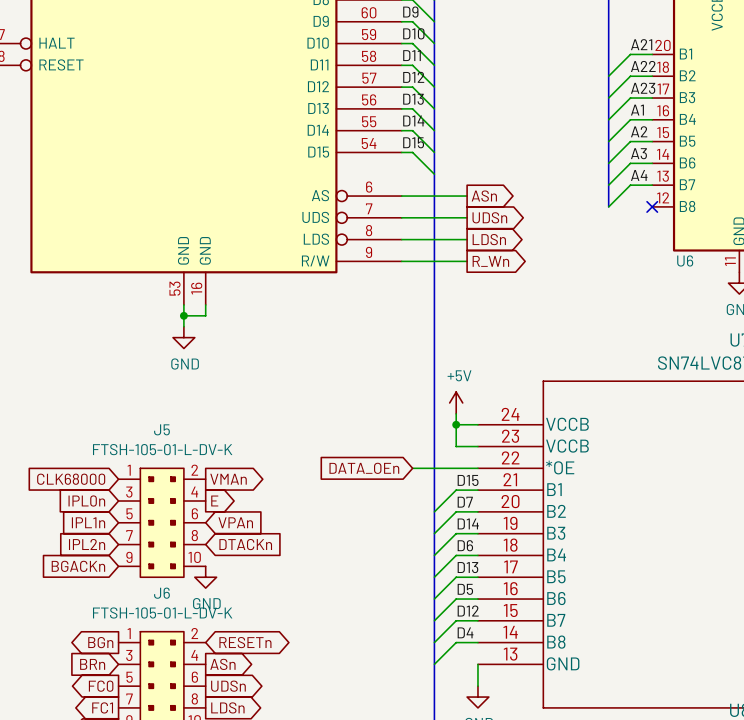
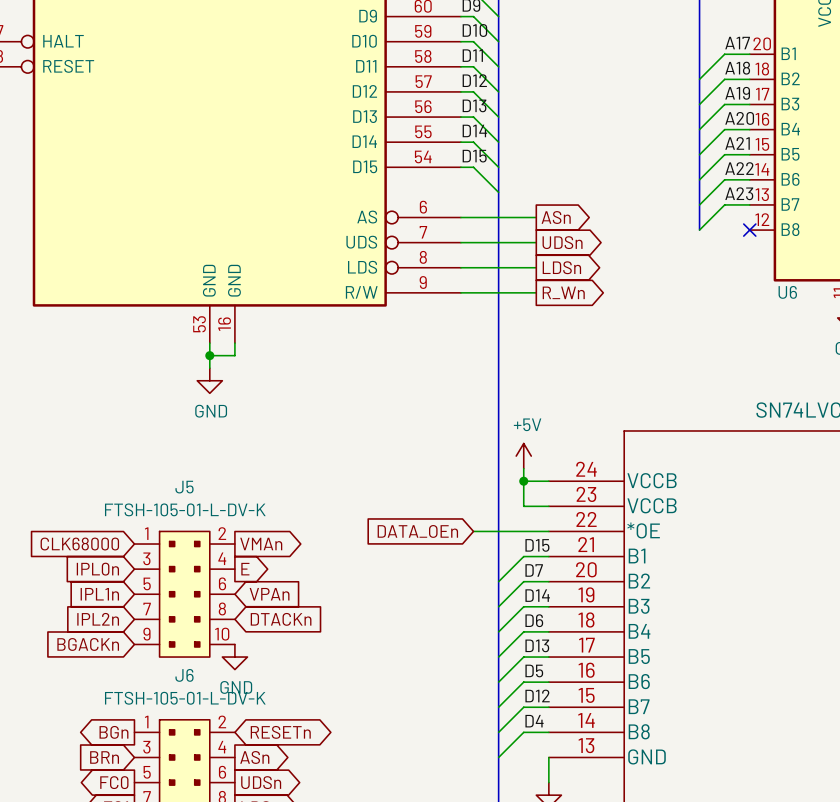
label: A21 (641, 44) -> A17 (737, 43)
label: A22 (643, 66) -> A18 (737, 68)
label: A23 (643, 88) -> A19 (737, 93)
label: A1 (637, 110) -> A20 (739, 118)
label: A2 (639, 131) -> A21 (737, 143)
label: A3 (638, 153) -> A22 (739, 168)
label: A4 (639, 175) -> A23 (739, 193)

